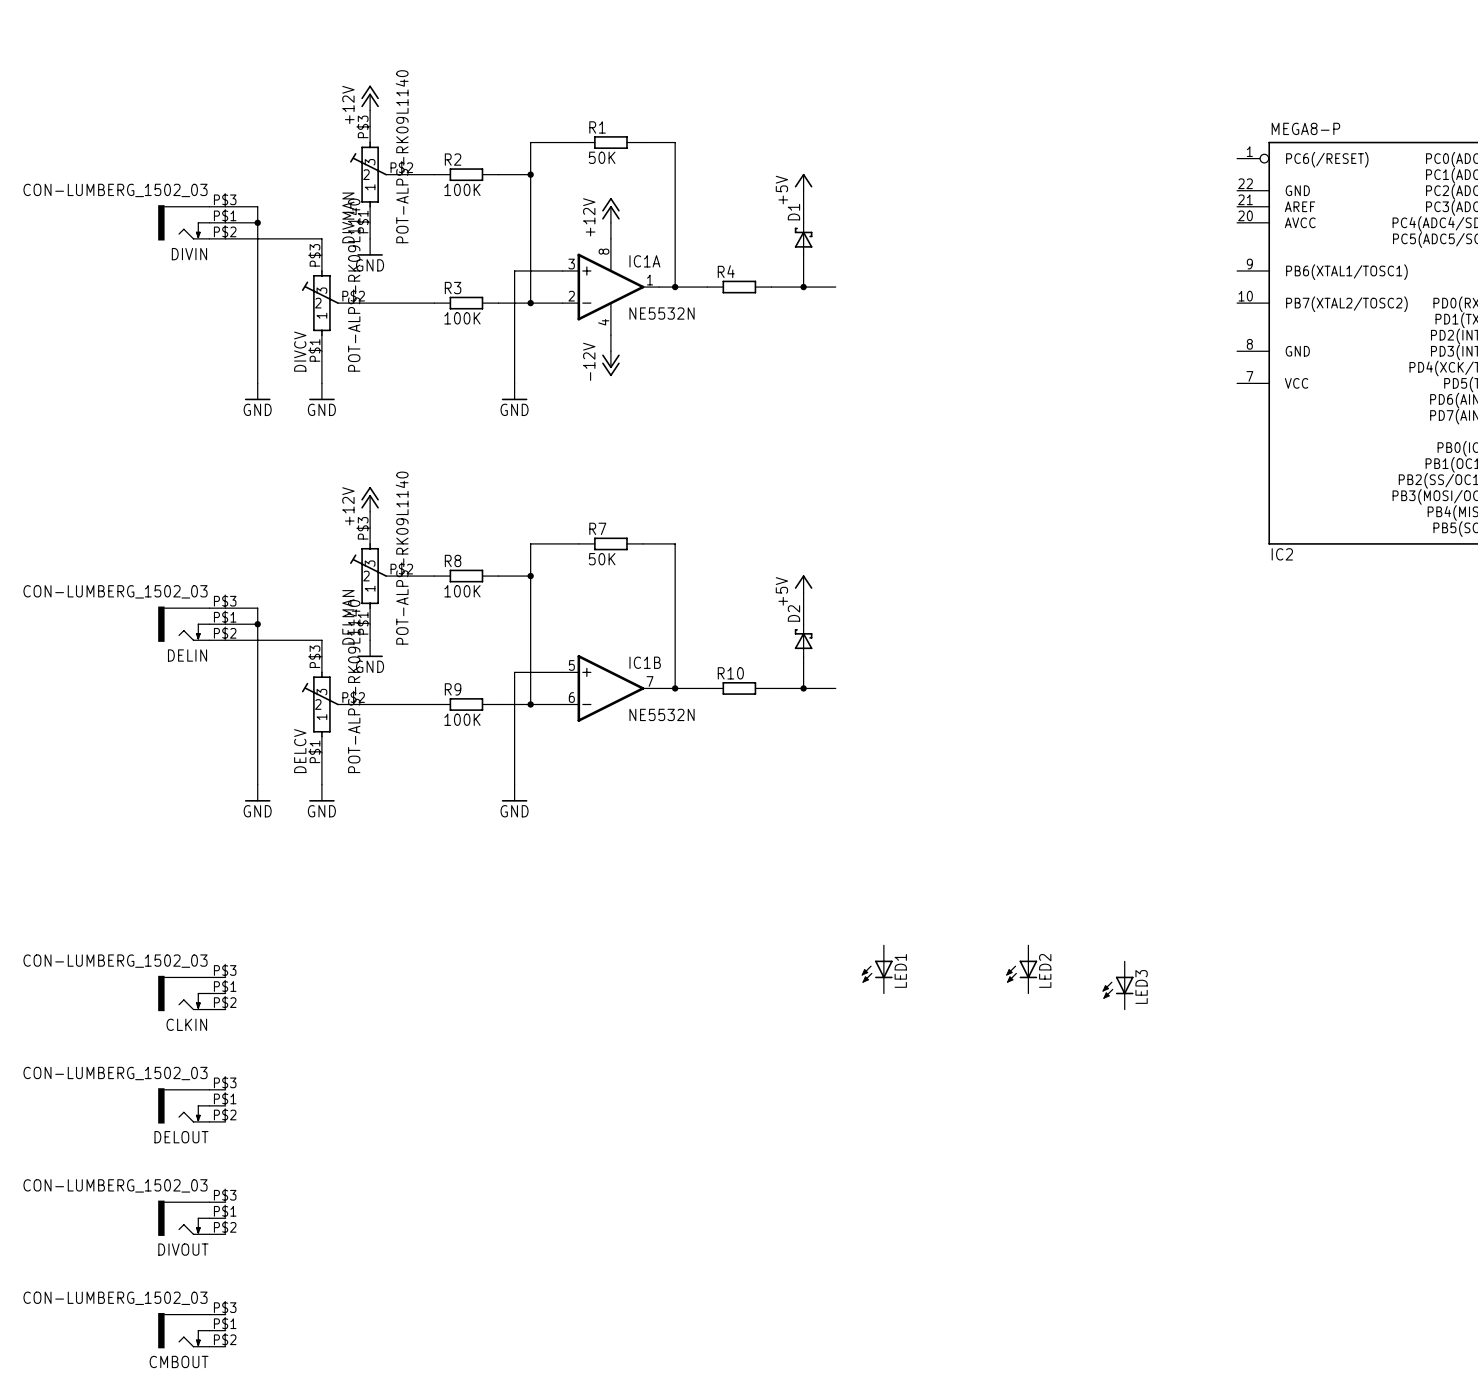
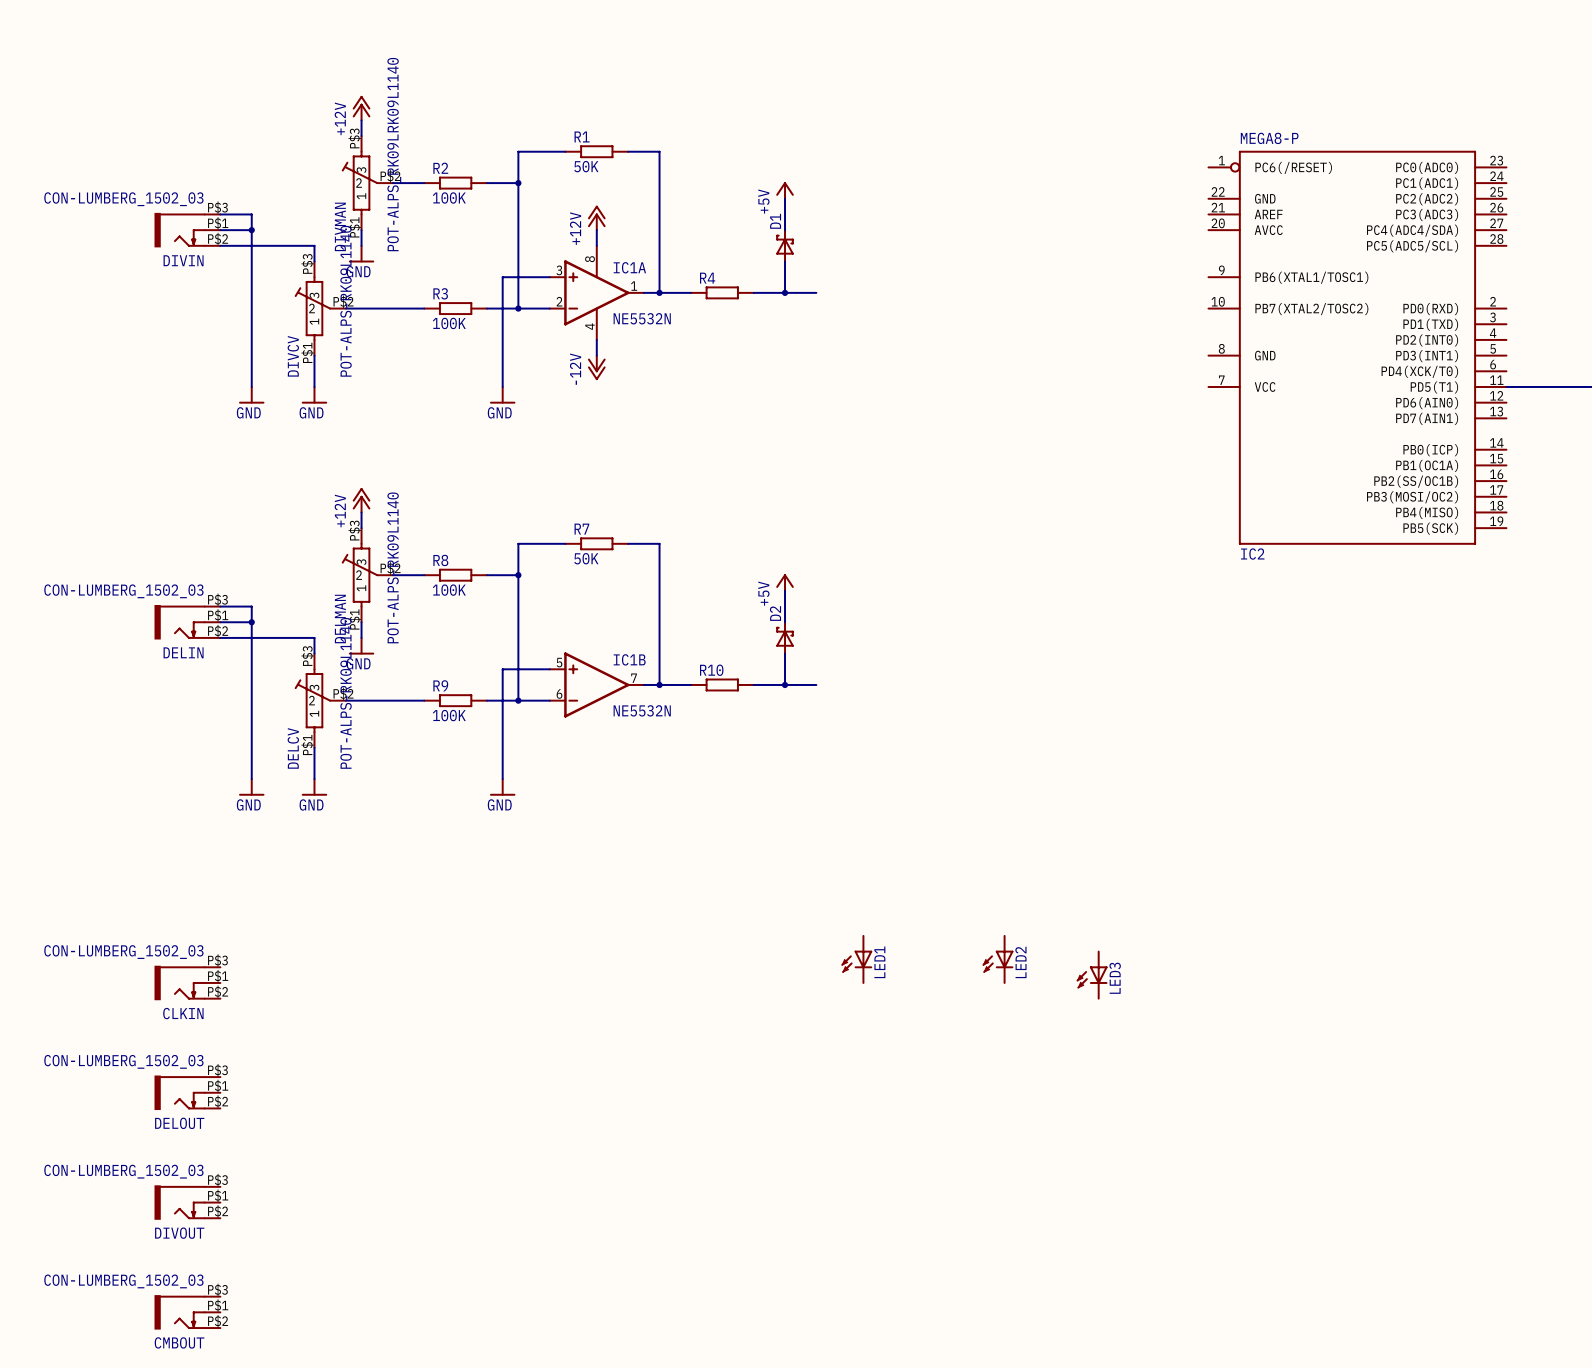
DIVMAN value: POT-ALPS-RK09L1140 (402, 156) -> POT-ALPS_RK09LRK09L1140 (394, 154)

